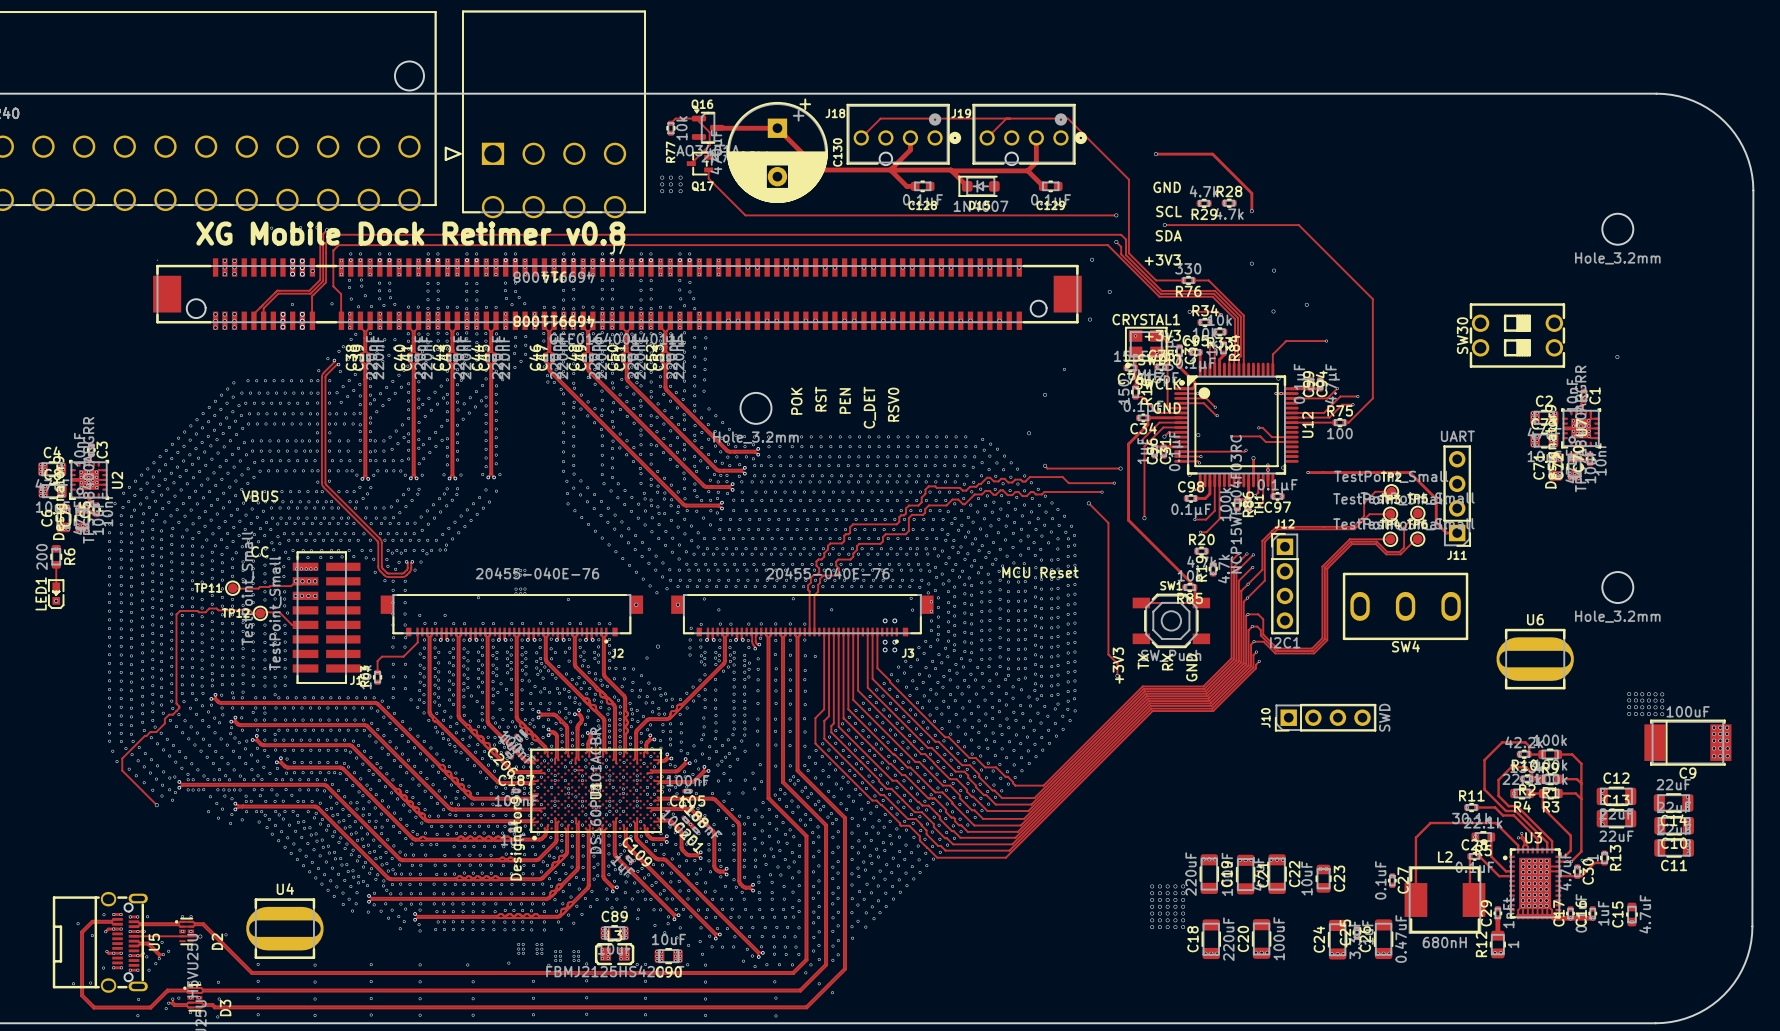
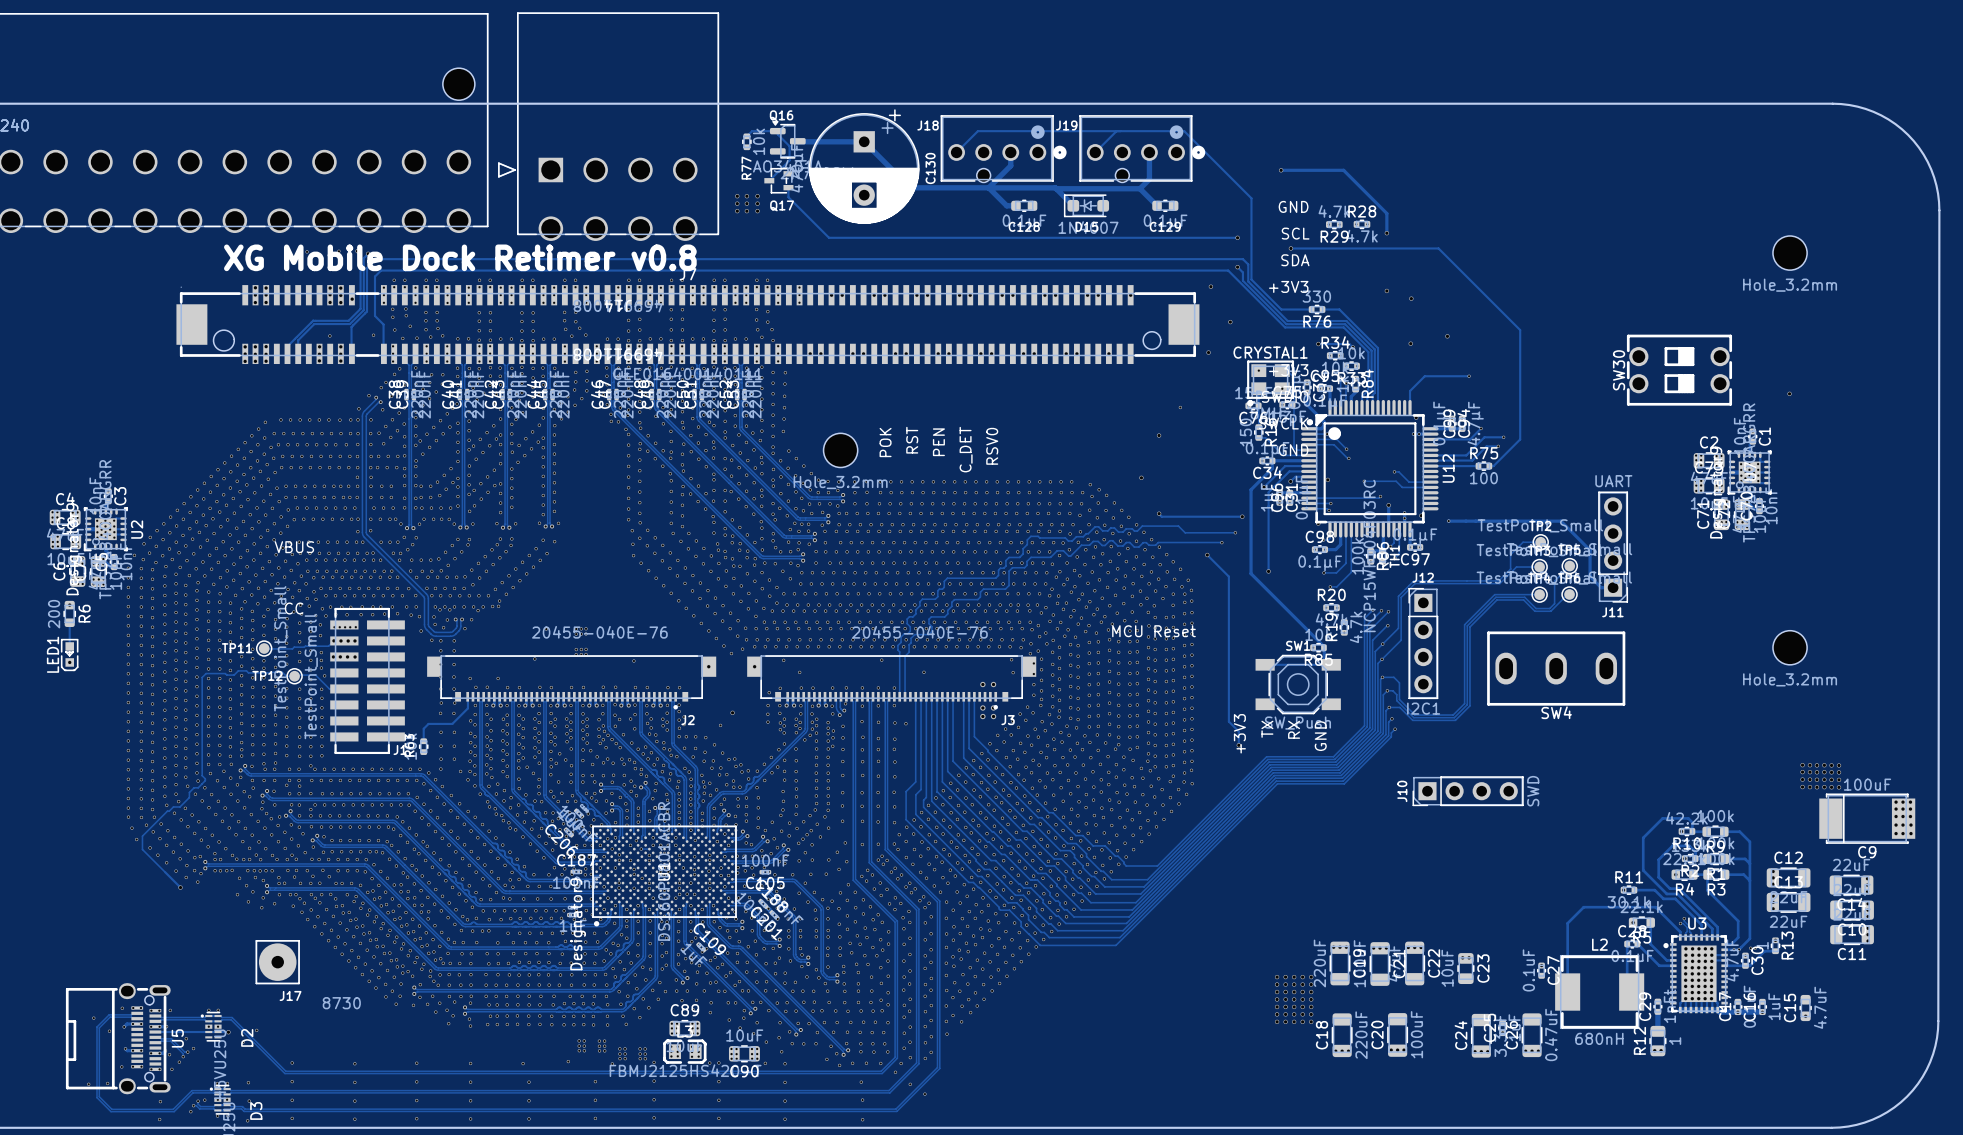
U6: (1535, 659) -> none
J17: none -> 8730 (277, 962)
U4: (284, 928) -> none

